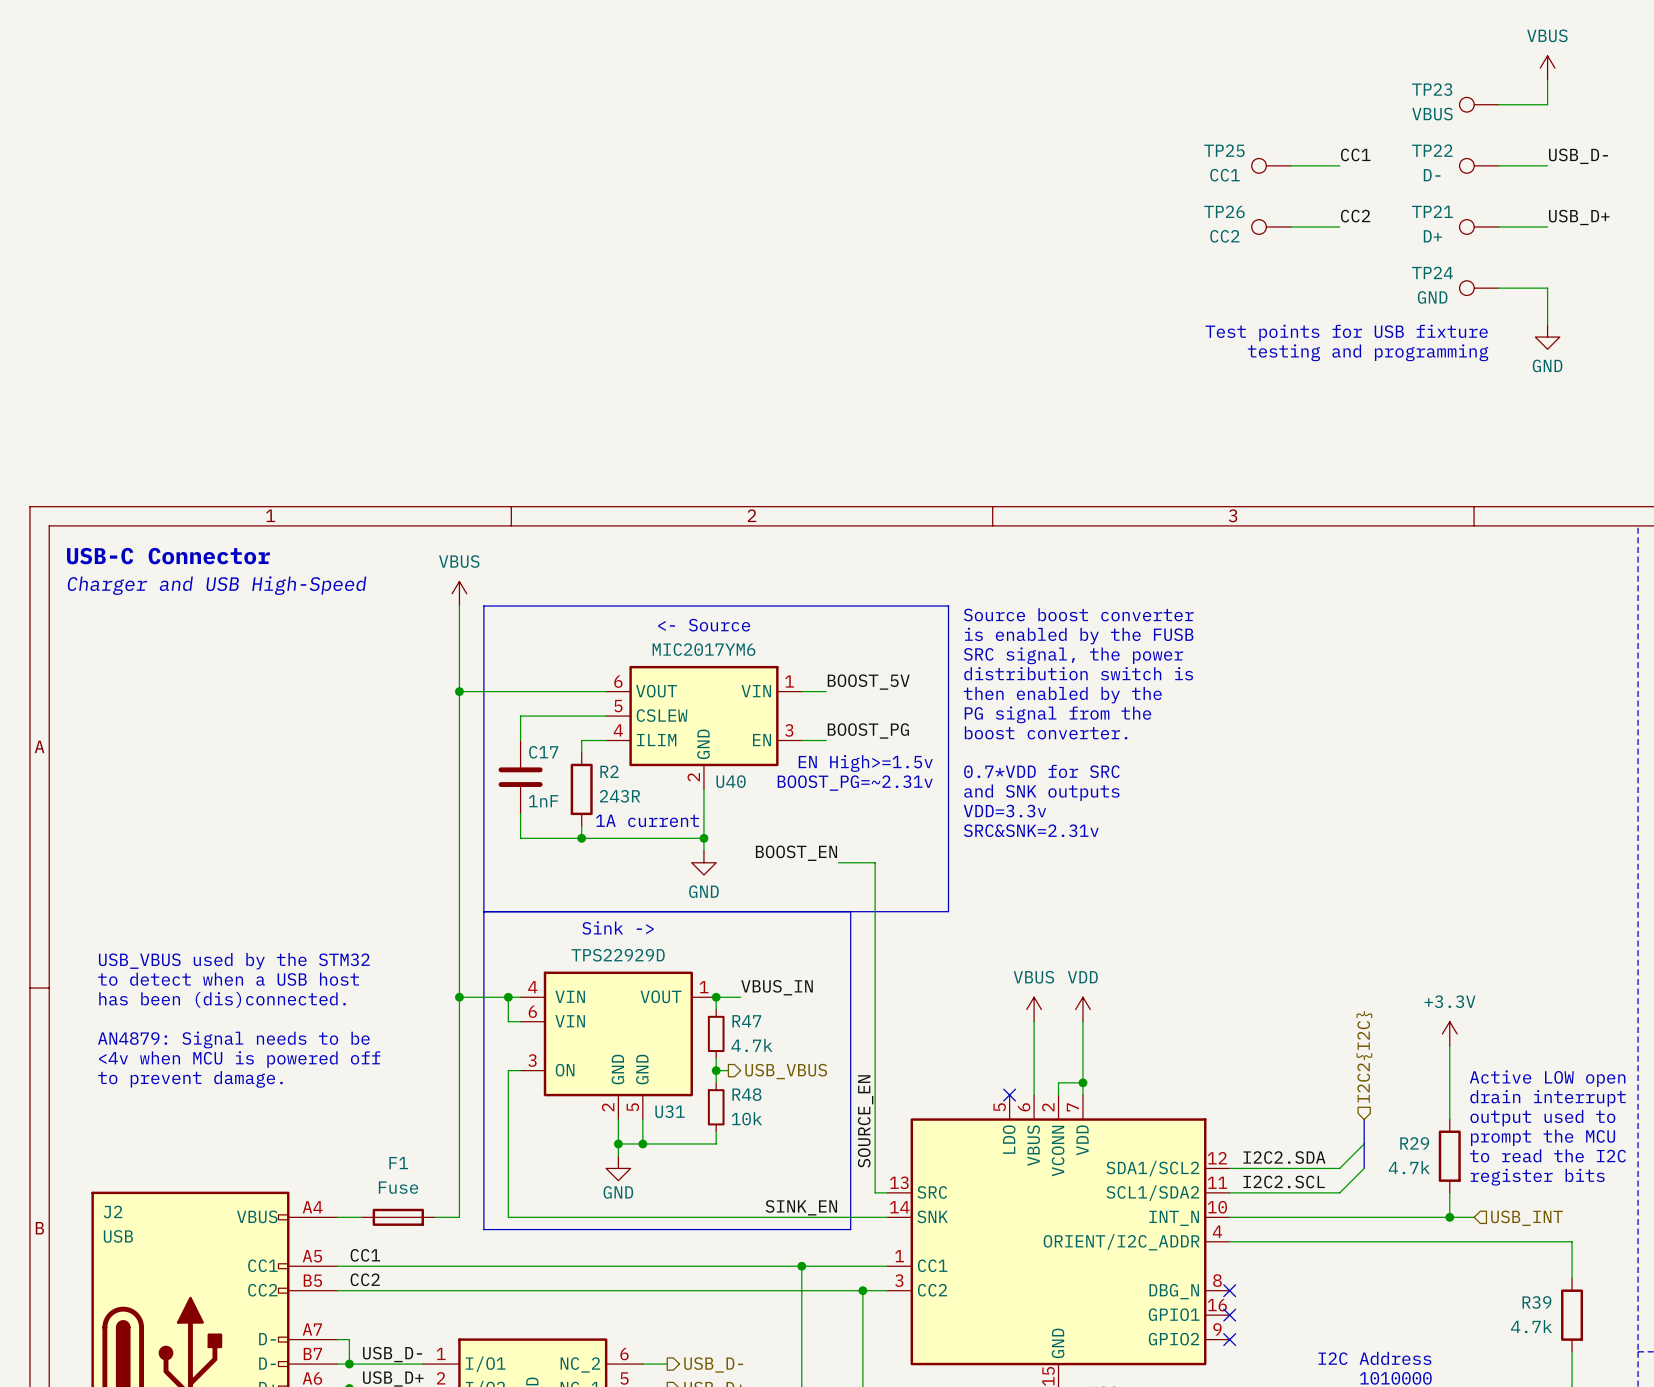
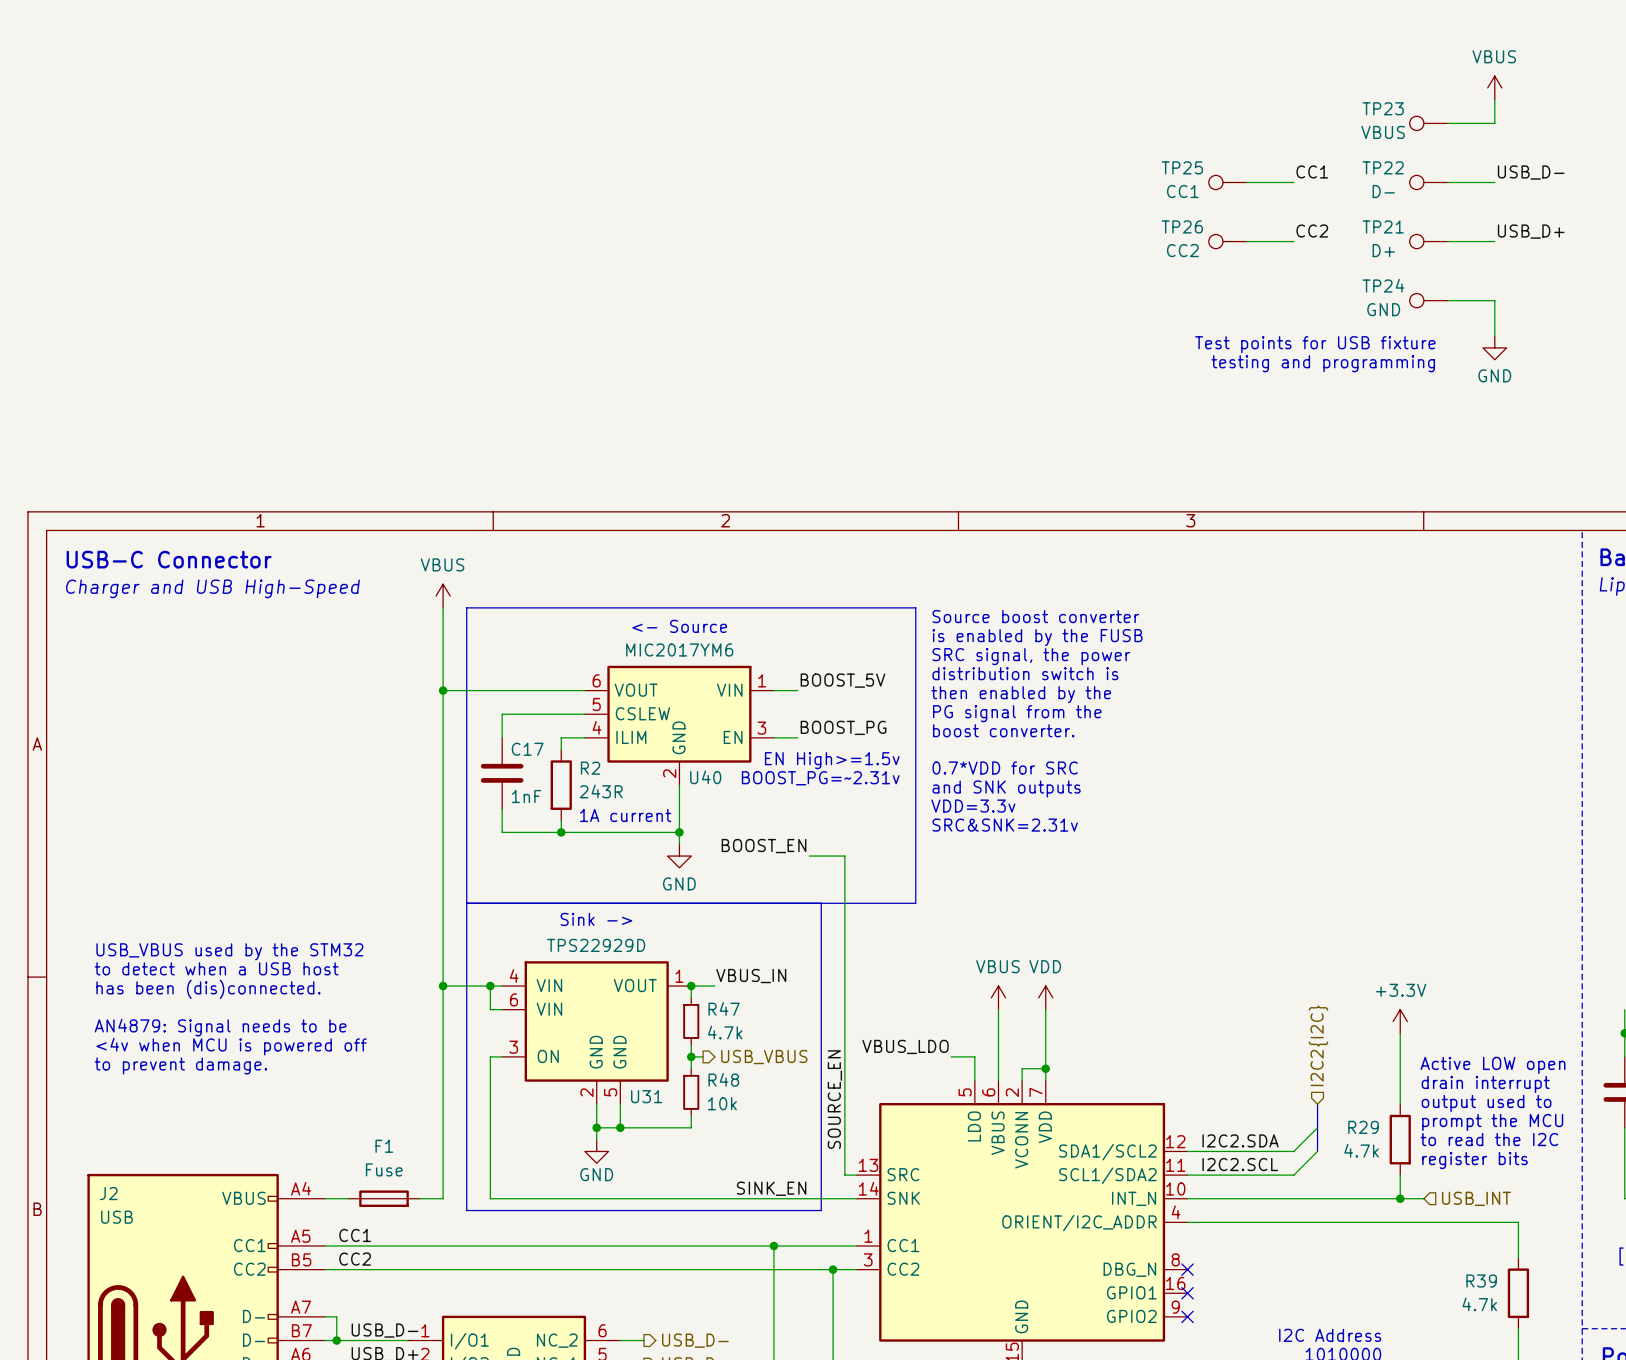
label: none -> VBUS_LDO (905, 1046)
wire: none -> (951, 1056) (974, 1056) (974, 1080)
no-connect mark: (1009, 1095) -> none

